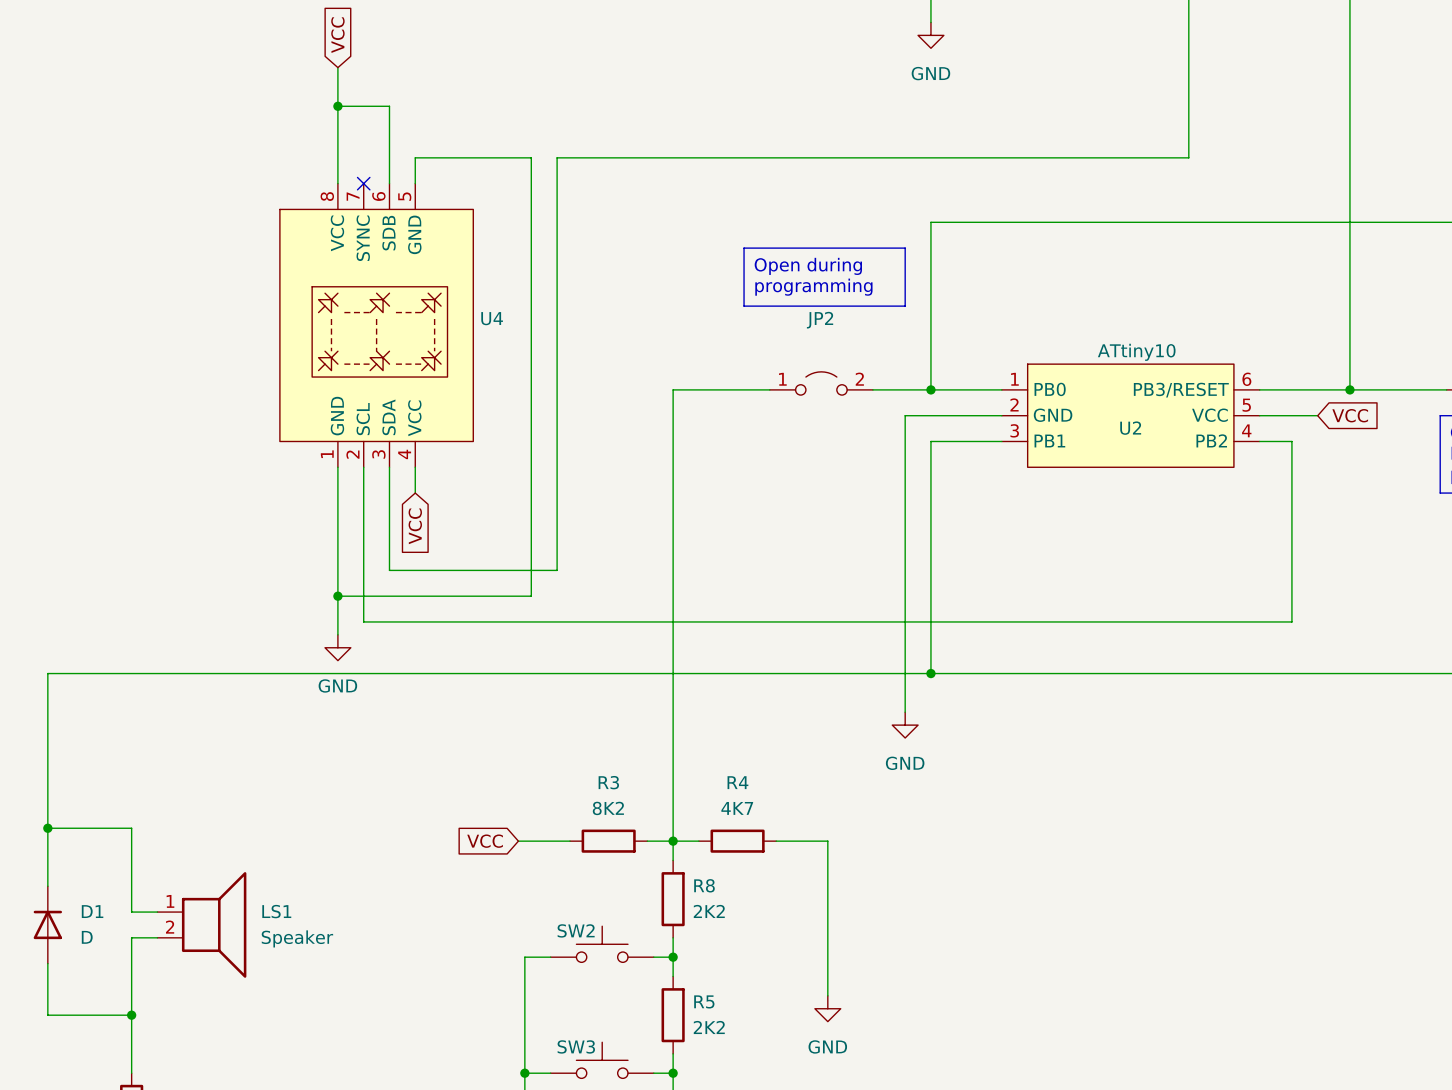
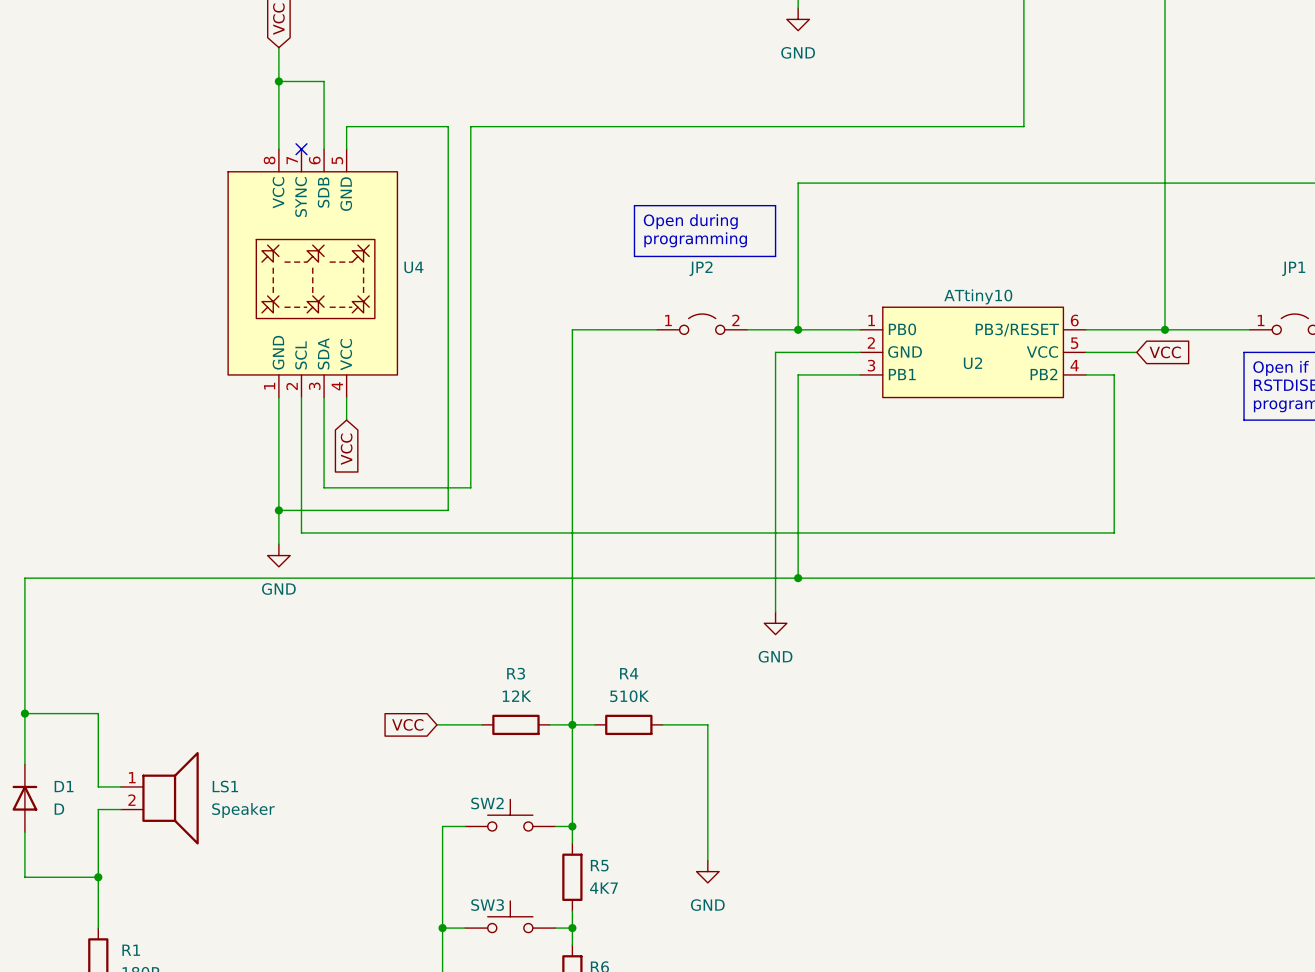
R3 value: 8K2 (608, 808) -> 12K (516, 696)
R4 value: 4K7 (737, 808) -> 510K (629, 696)
wire: none -> (572, 741) (572, 809)
R8: 2K2 (673, 899) -> none
R5 value: 2K2 (709, 1027) -> 4K7 (603, 888)

